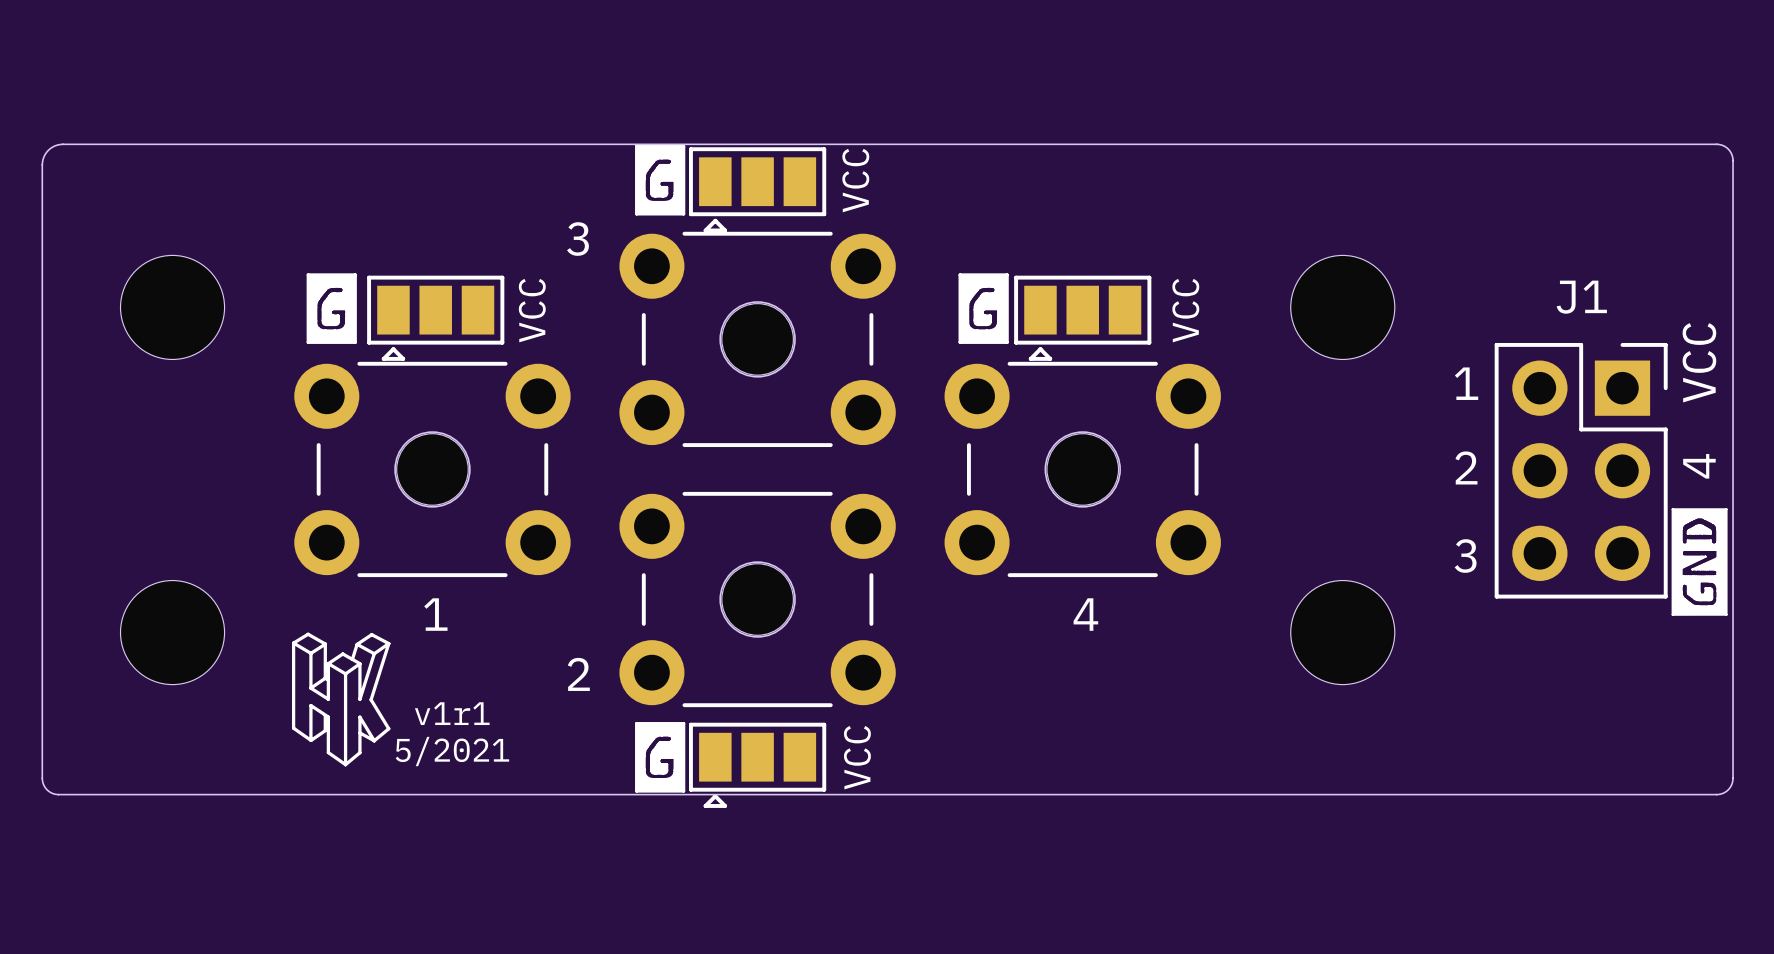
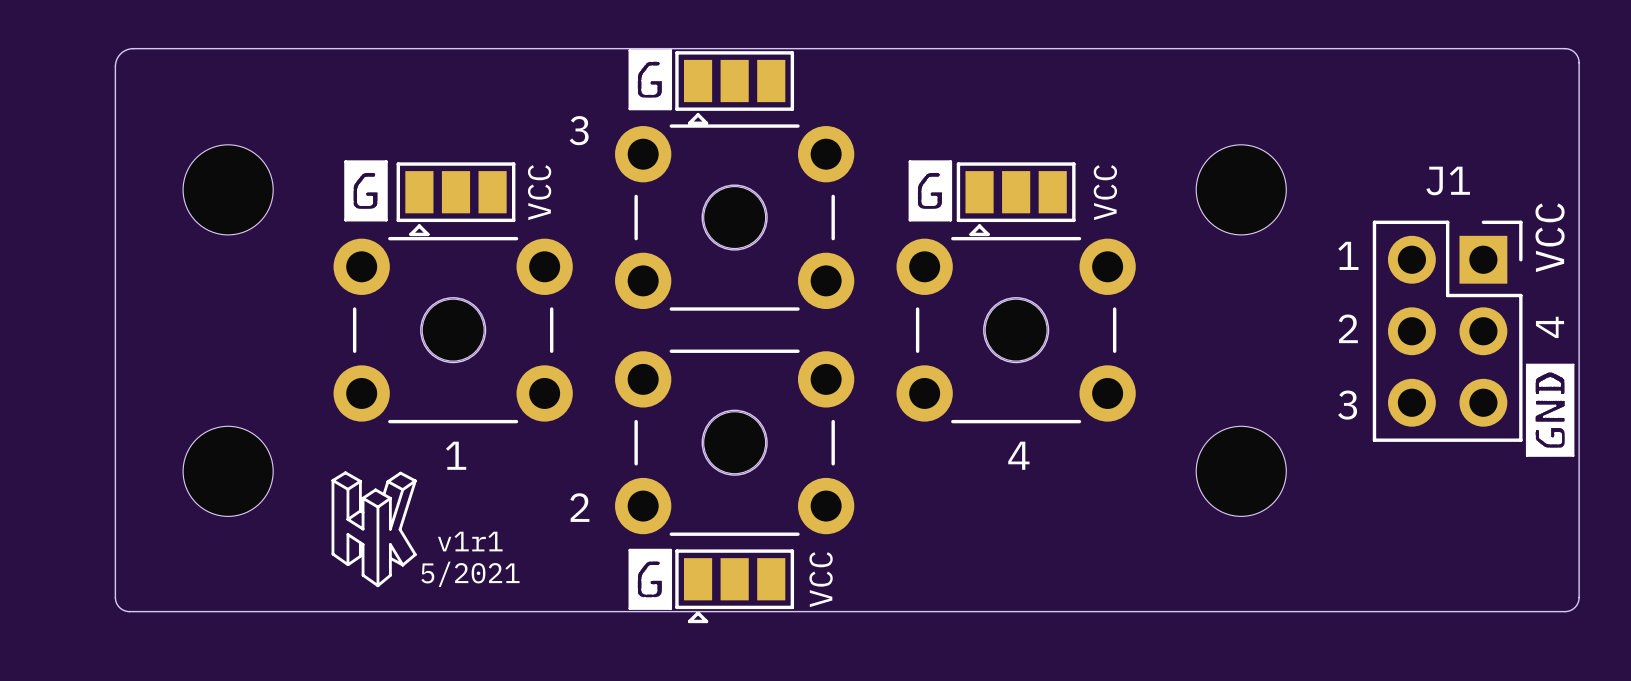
text: VCC (855, 180) -> none

